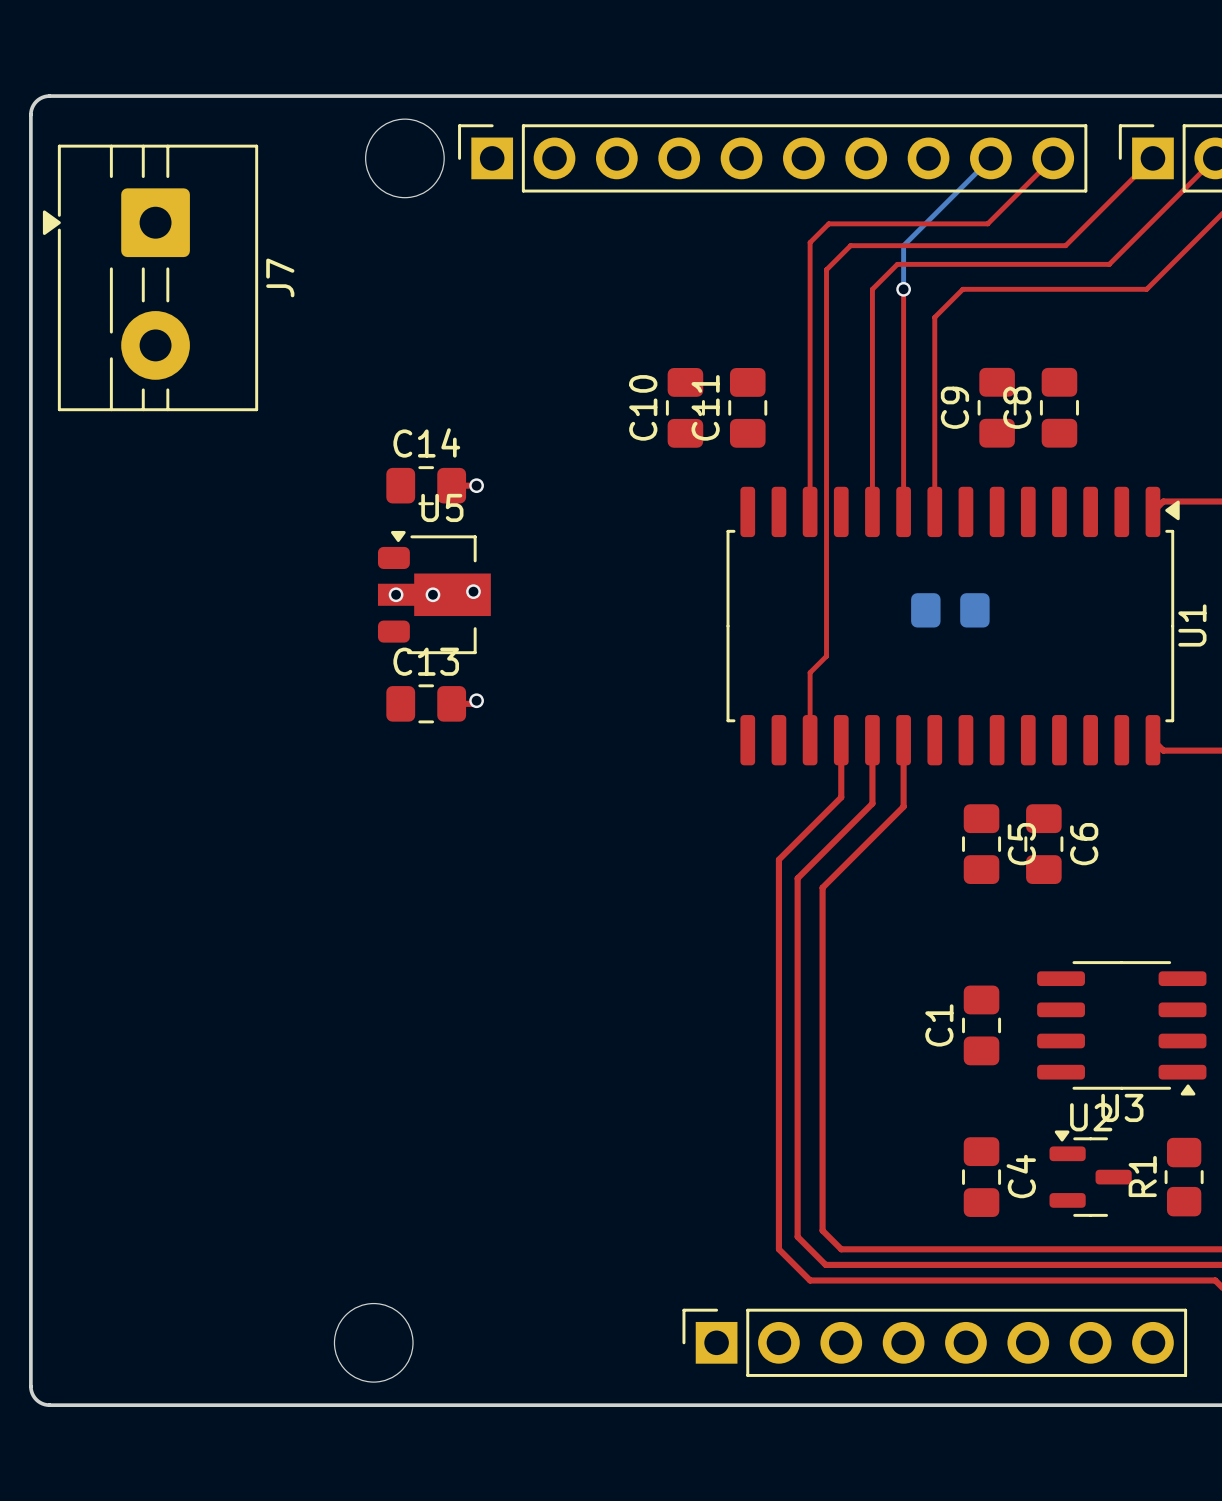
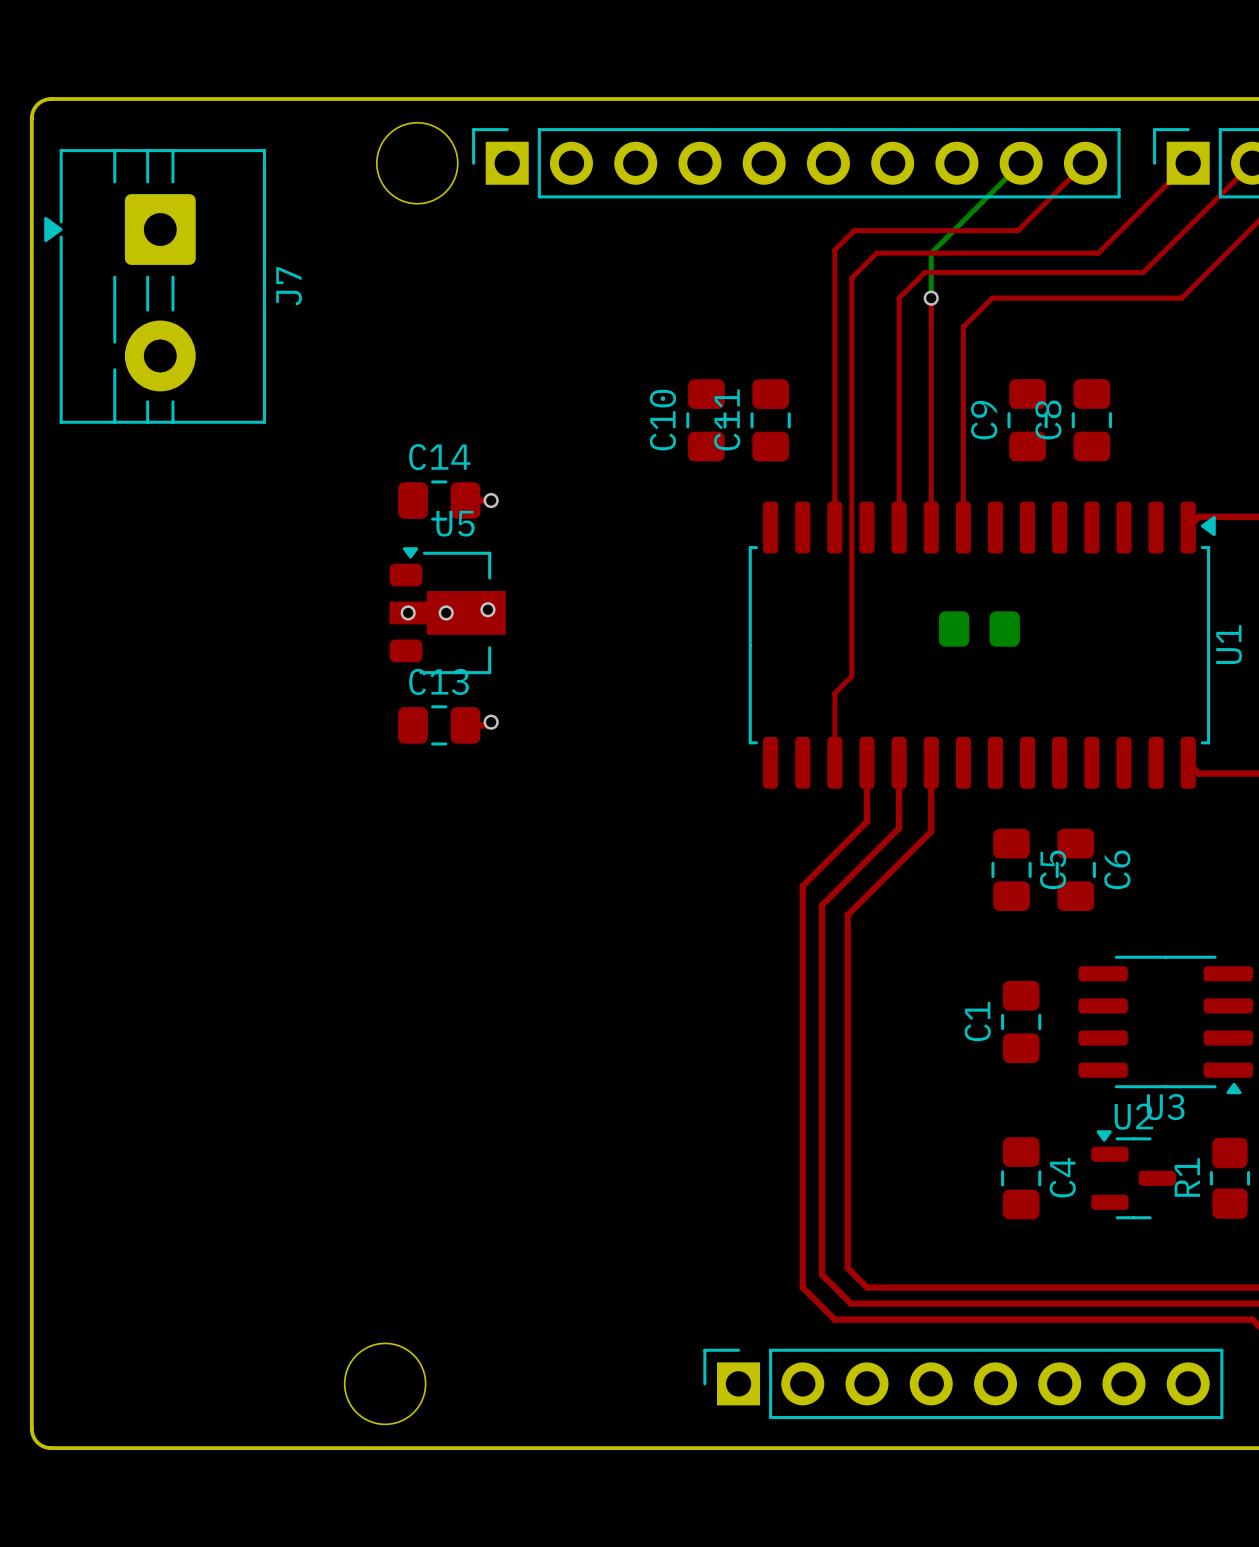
C1 position: (981, 1025) -> (1021, 1021)
U3 position: (1121, 1028) -> (1165, 1024)
U2 position: (1090, 1173) -> (1133, 1174)
C4 position: (981, 1177) -> (1021, 1178)
R1 position: (1184, 1177) -> (1229, 1178)

